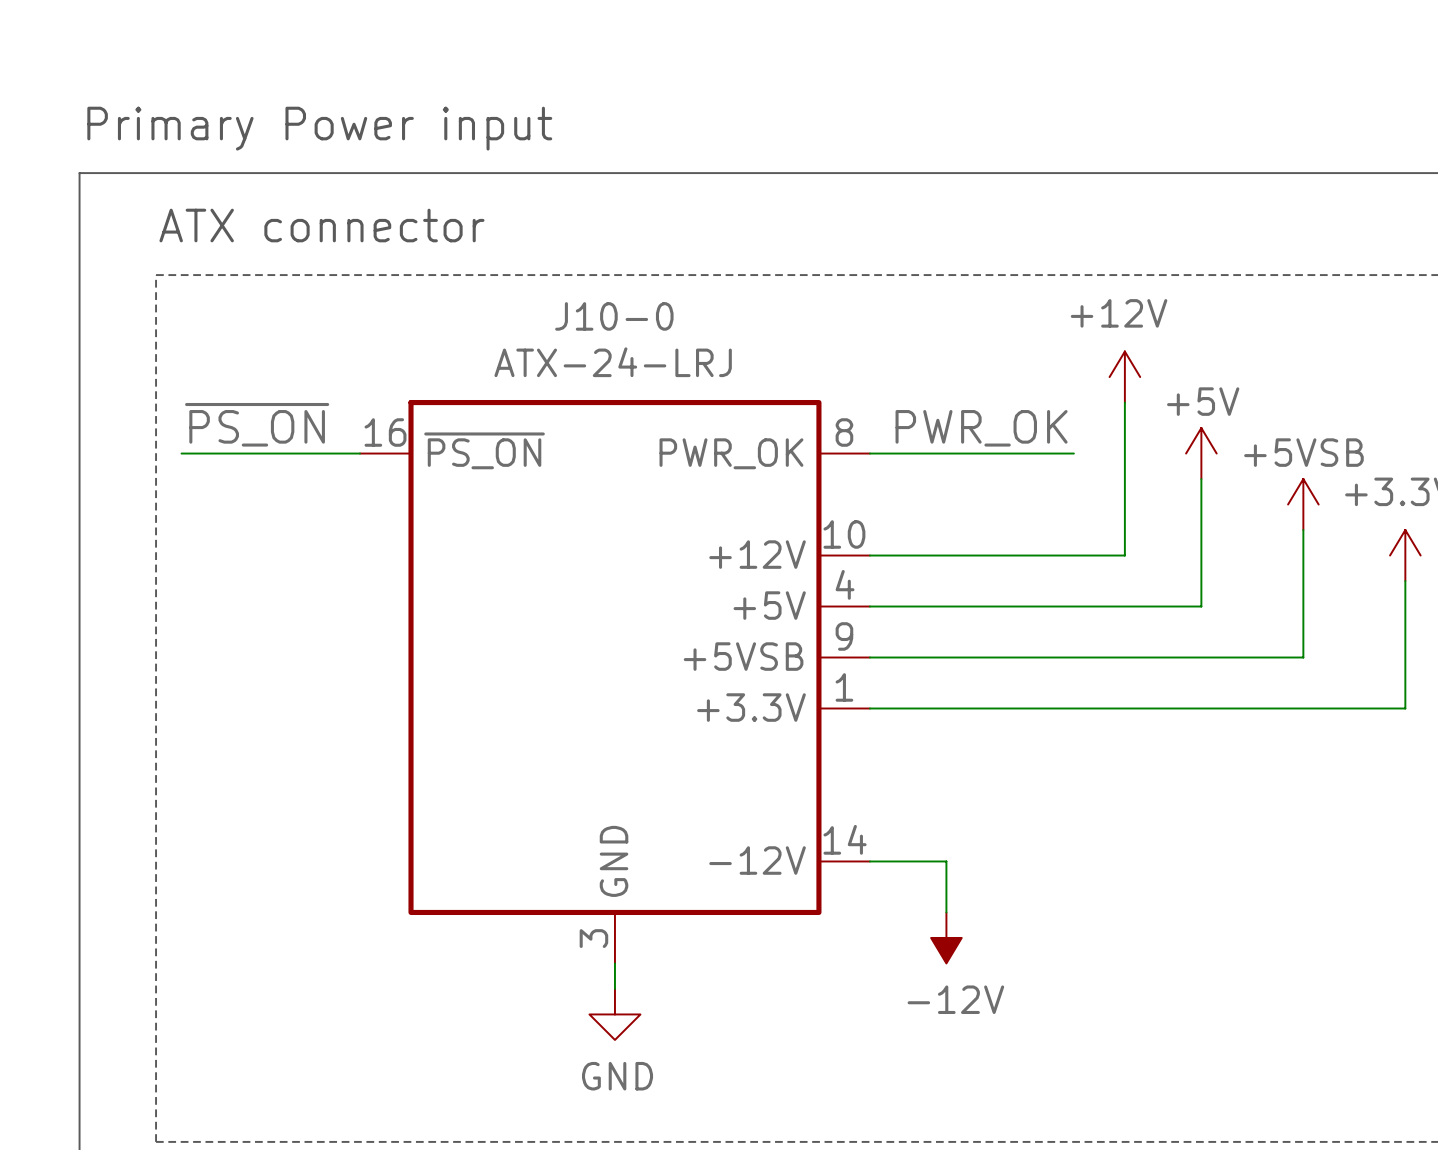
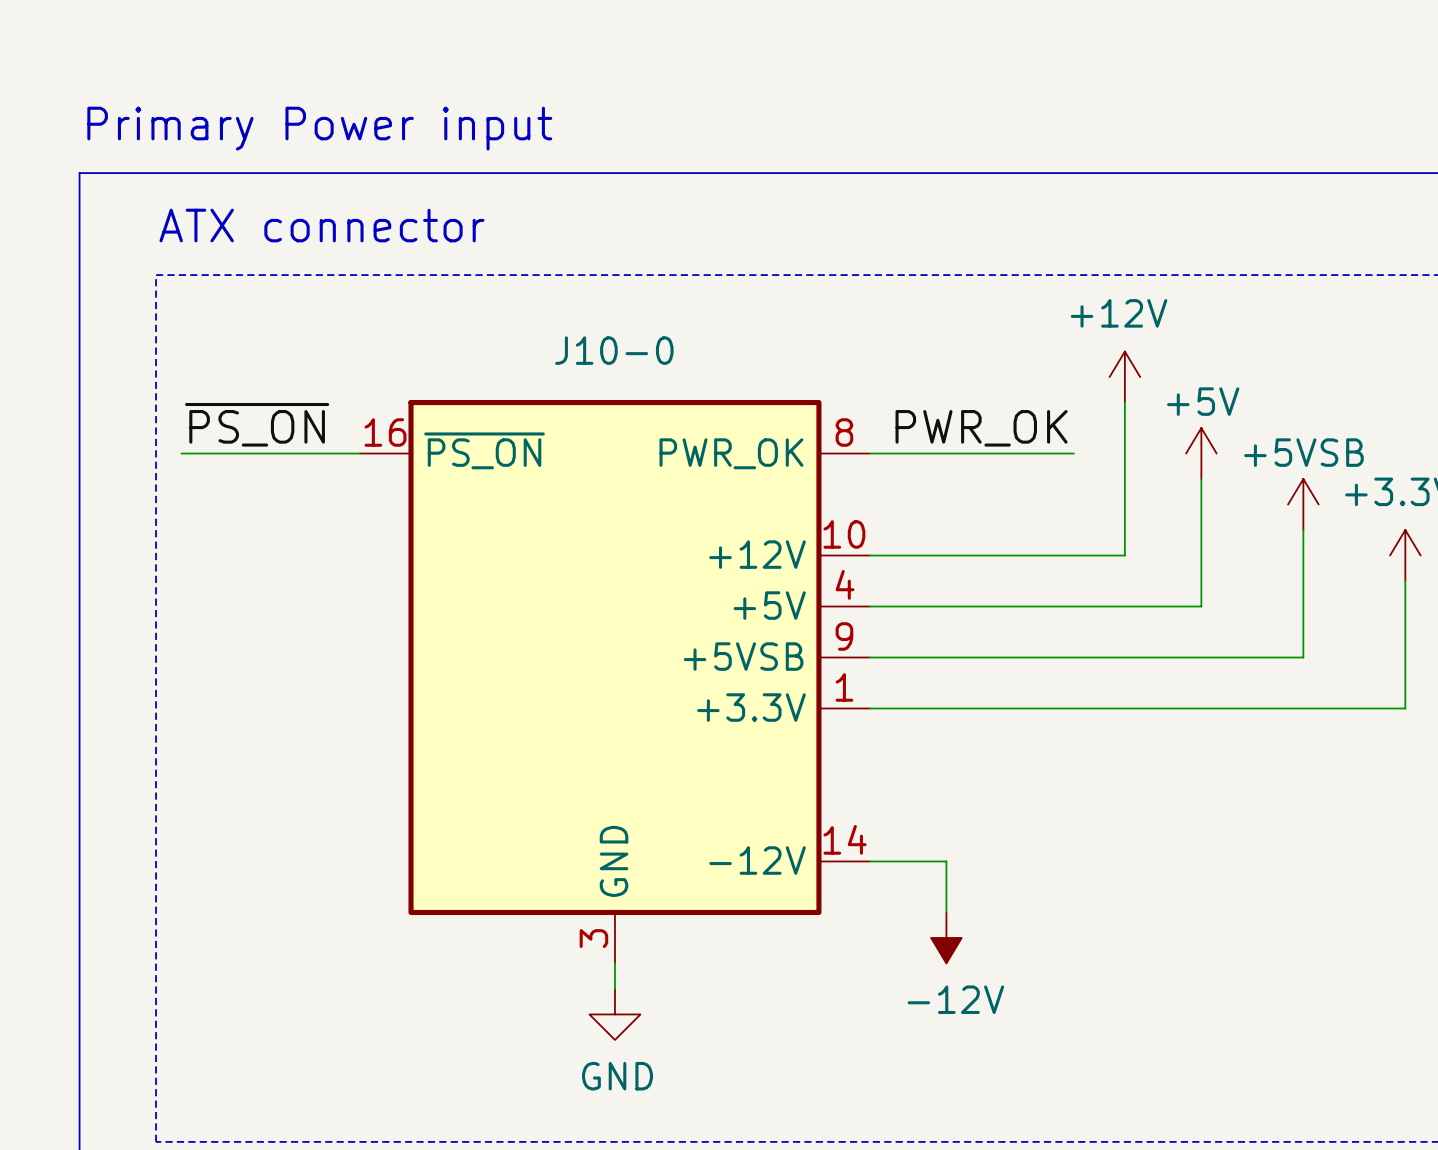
J10-0 name position: J10-0 (614, 316) -> J10-0 (614, 350)
J10-0 value: ATX-24-LRJ (613, 362) -> none

